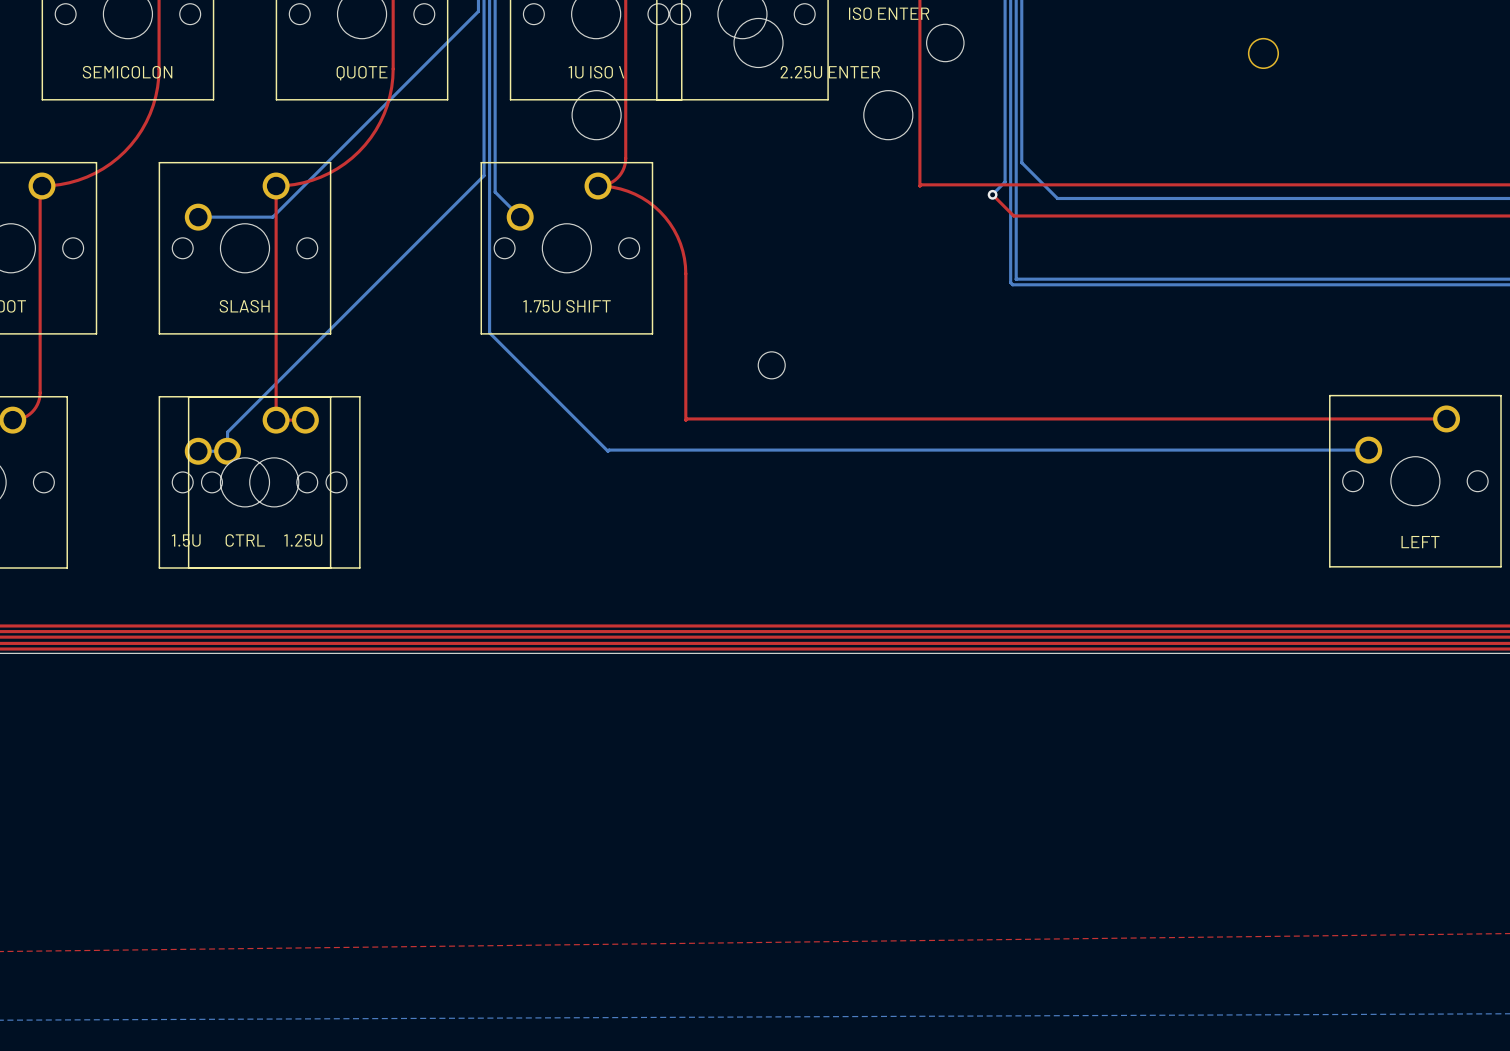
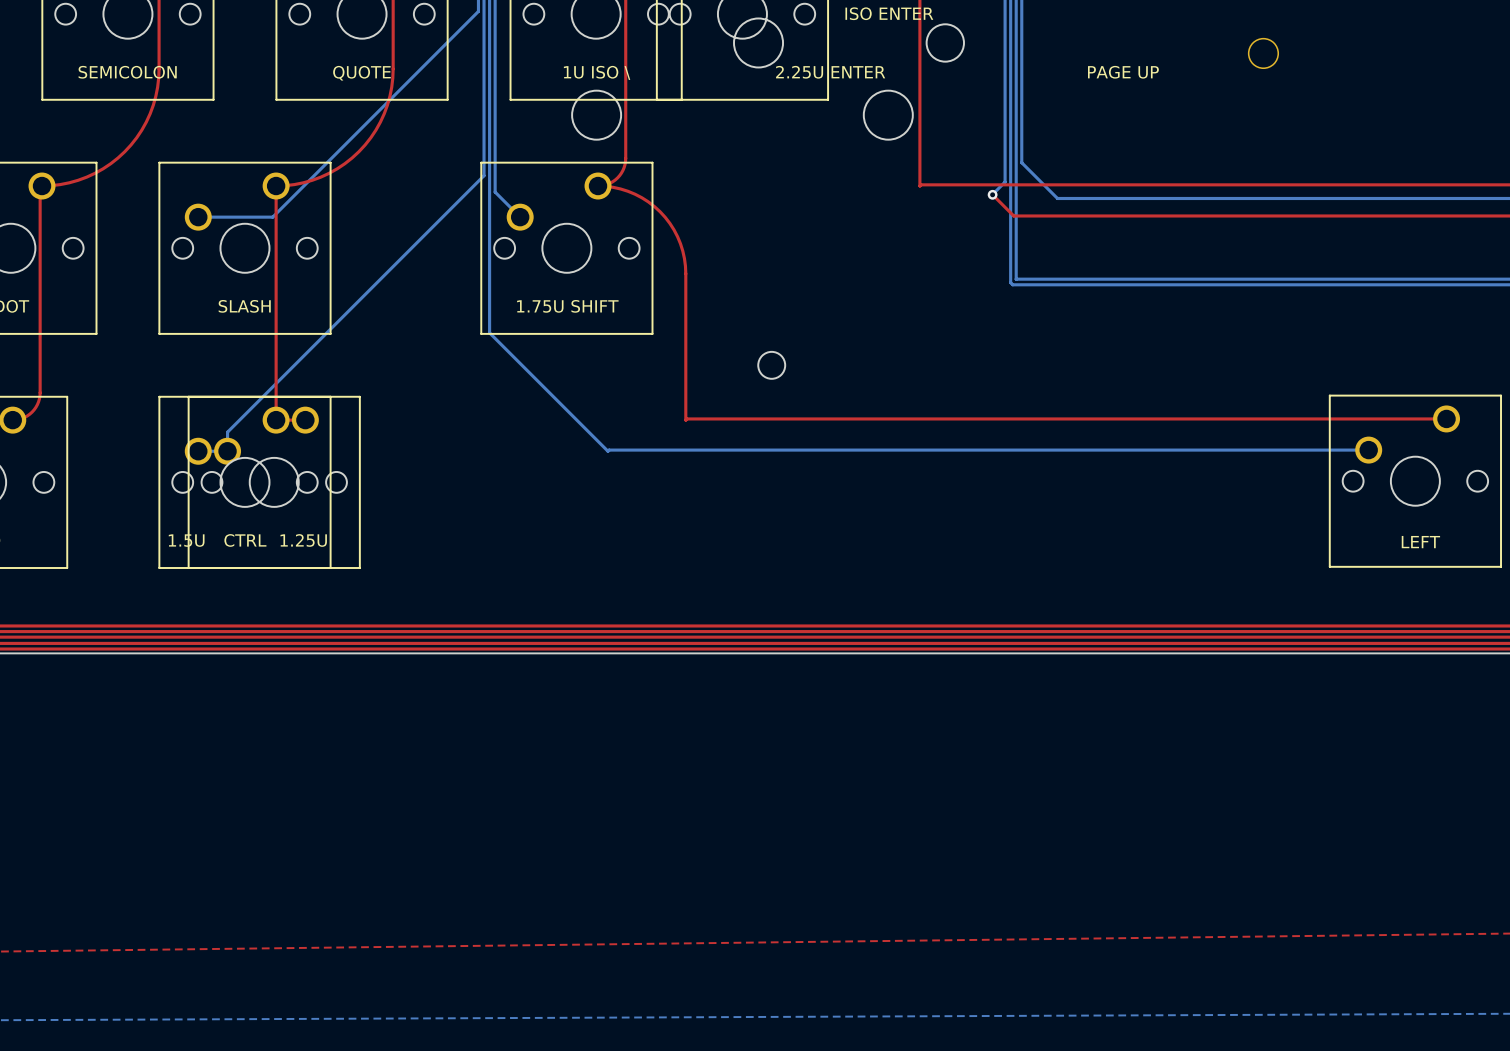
text: none -> PAGE UP (1123, 72)

